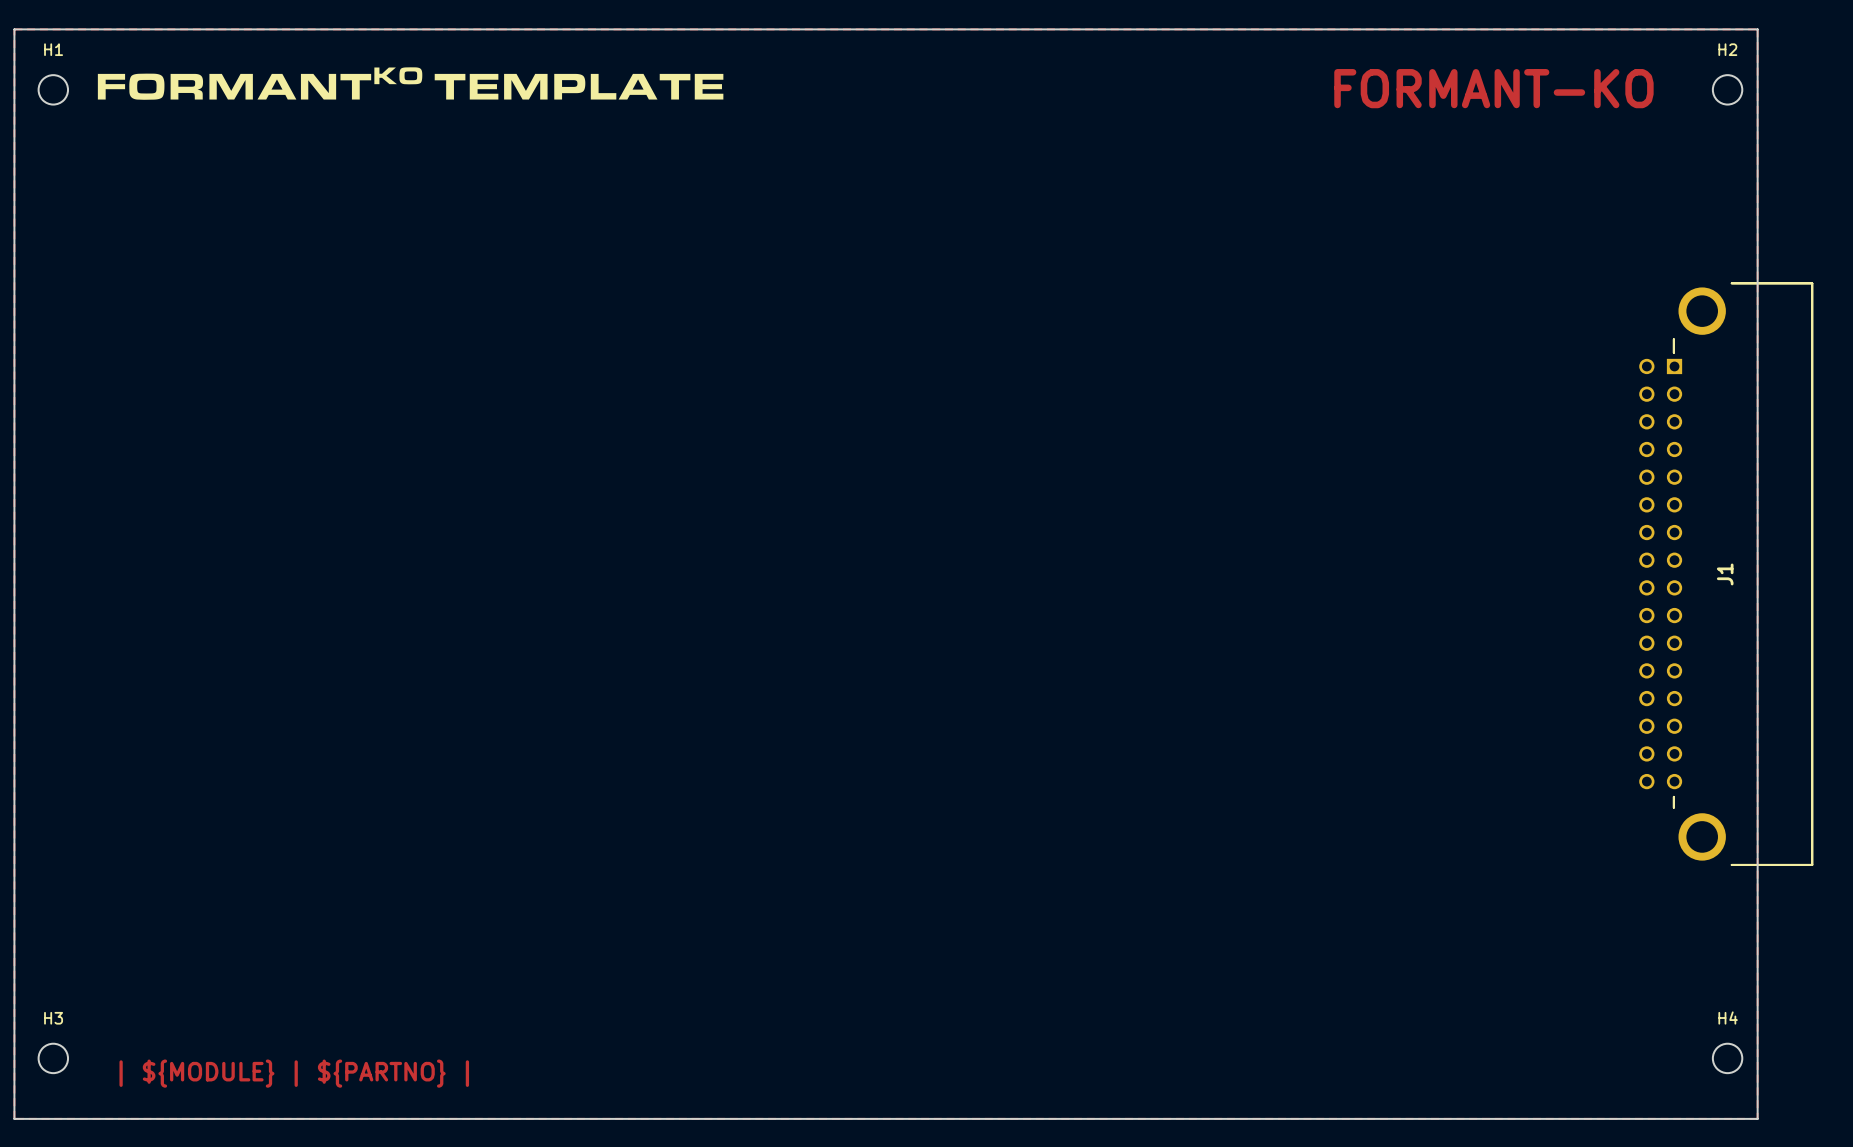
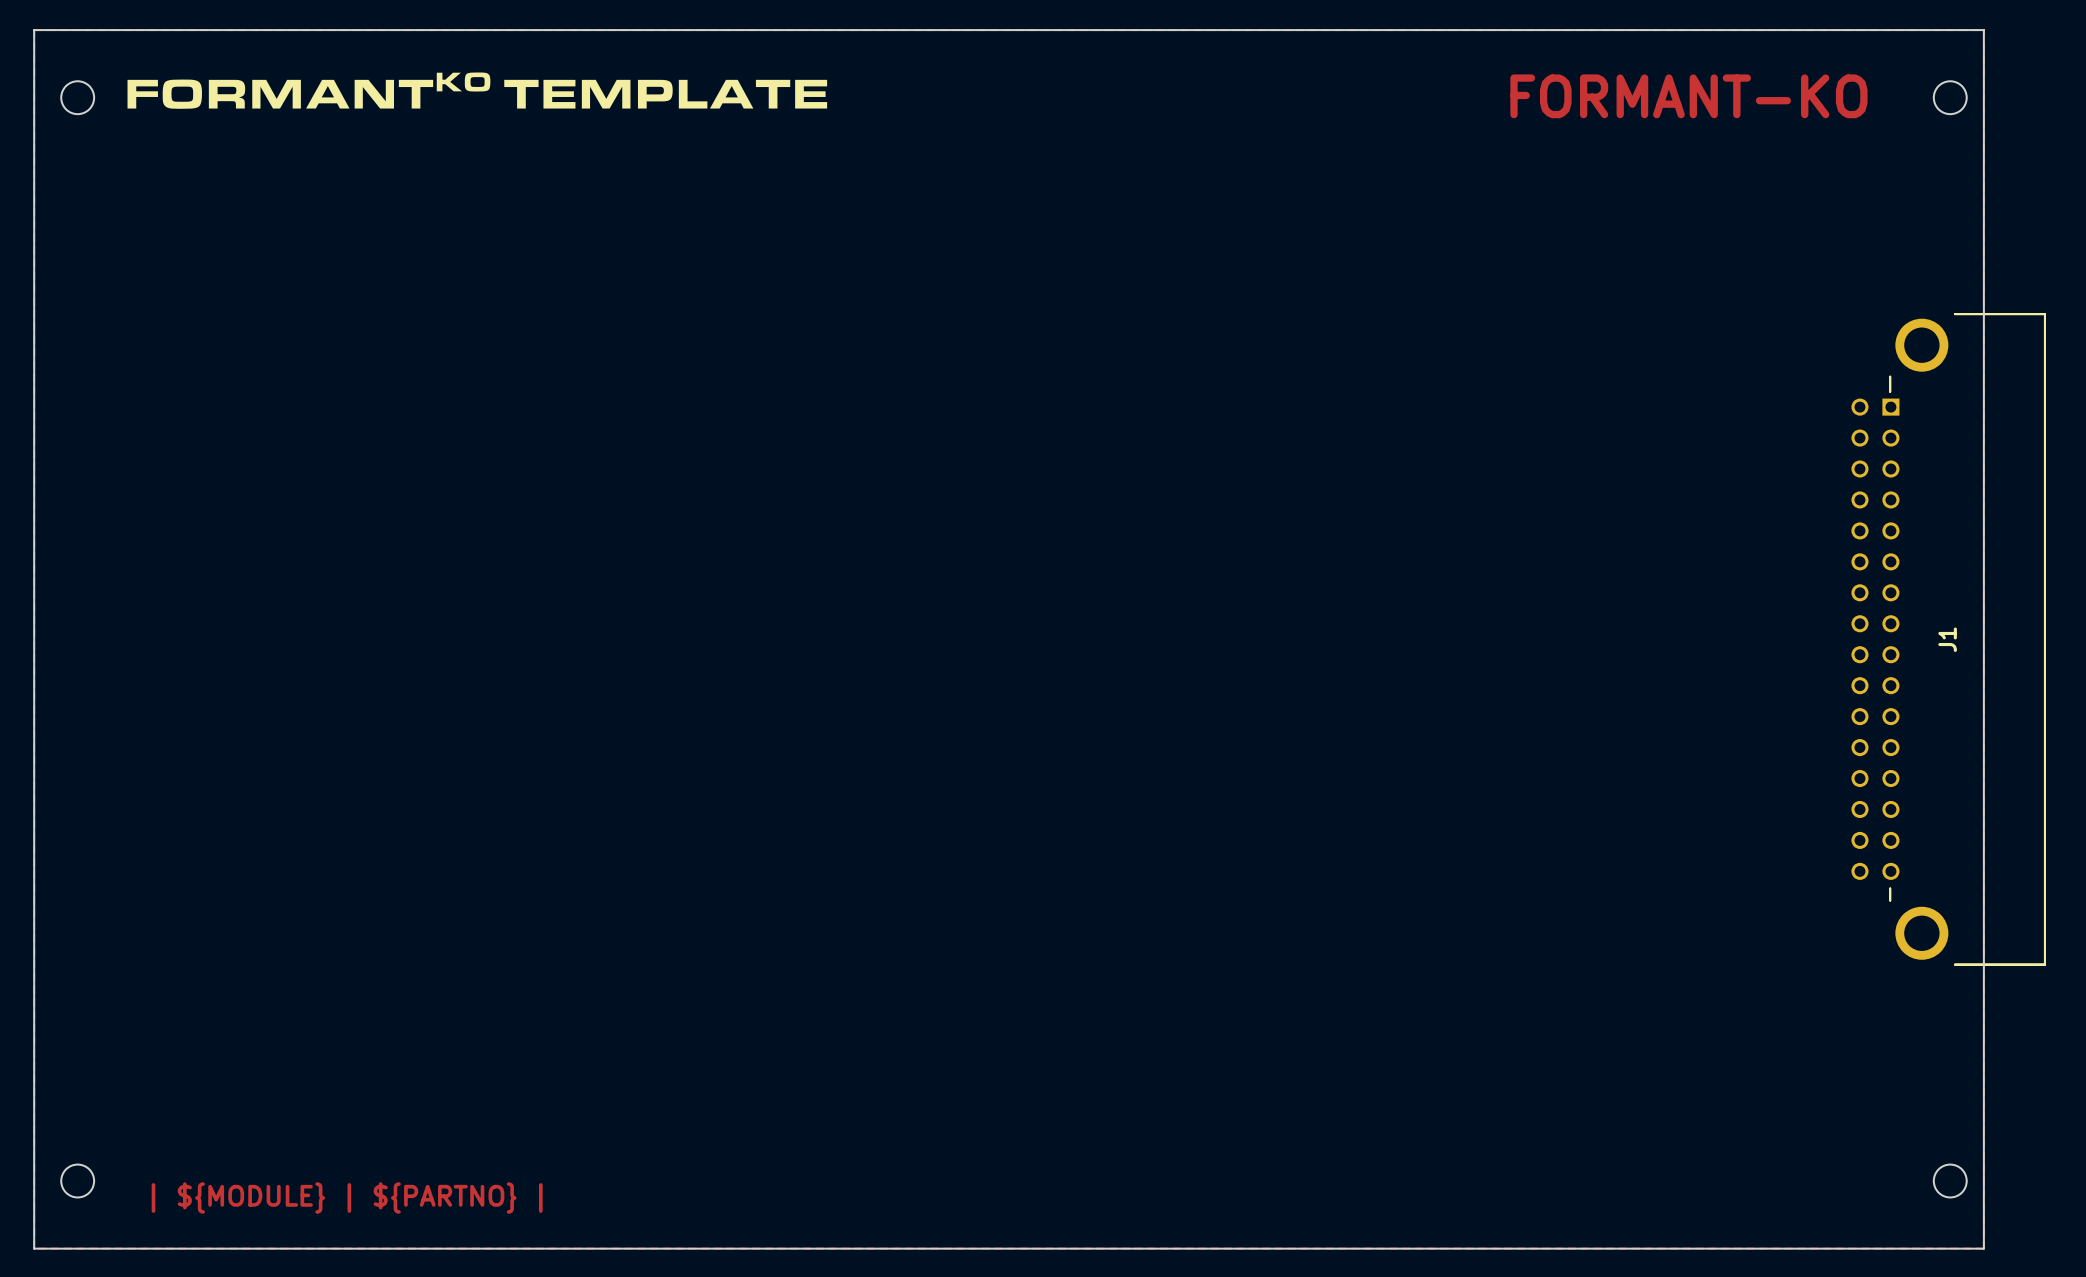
H1 name: H1 (53, 49) -> none
H2 name: H2 (1727, 49) -> none
H3 name: H3 (53, 1018) -> none
H4 name: H4 (1728, 1018) -> none

